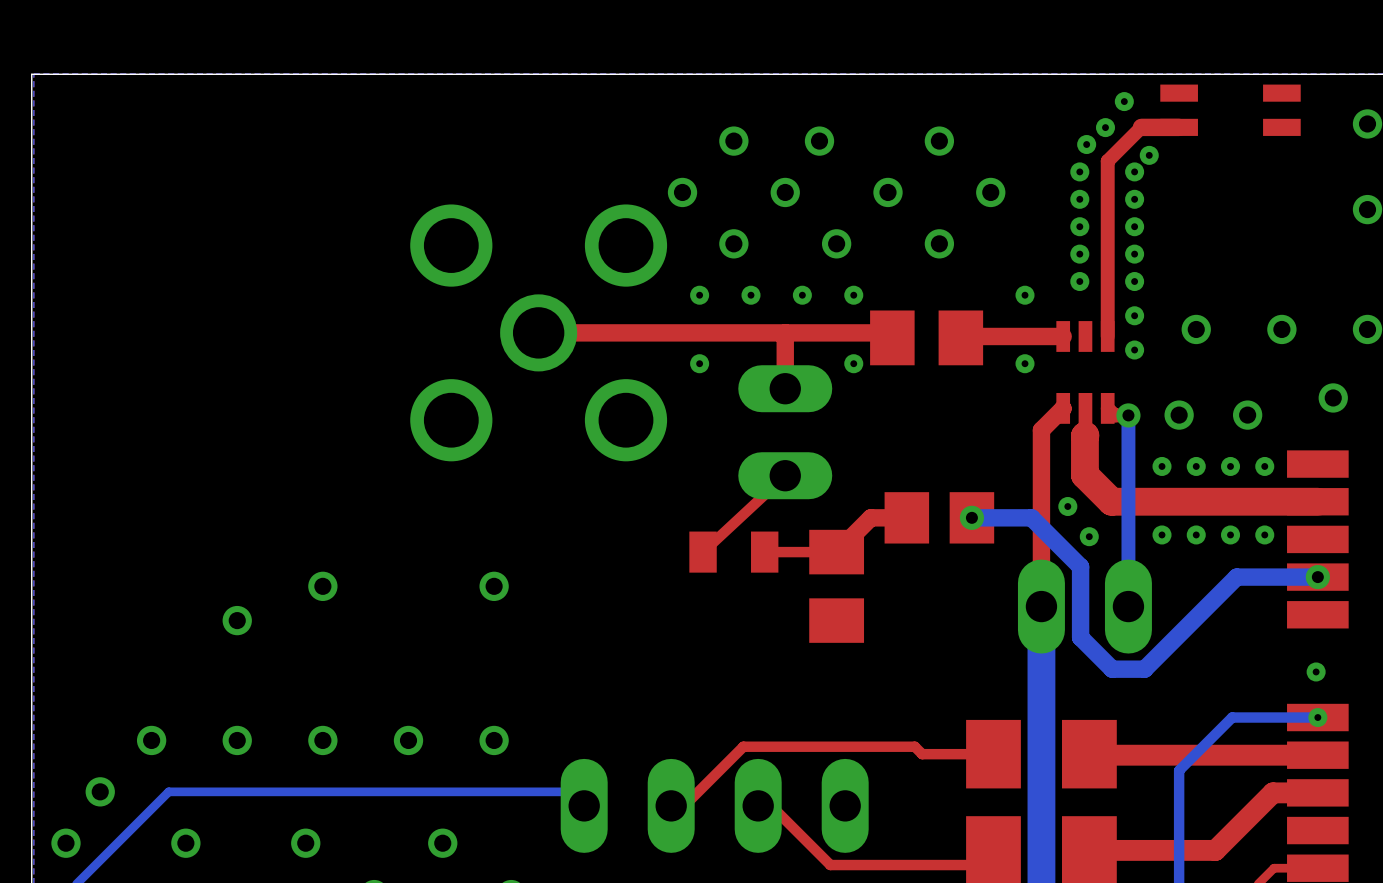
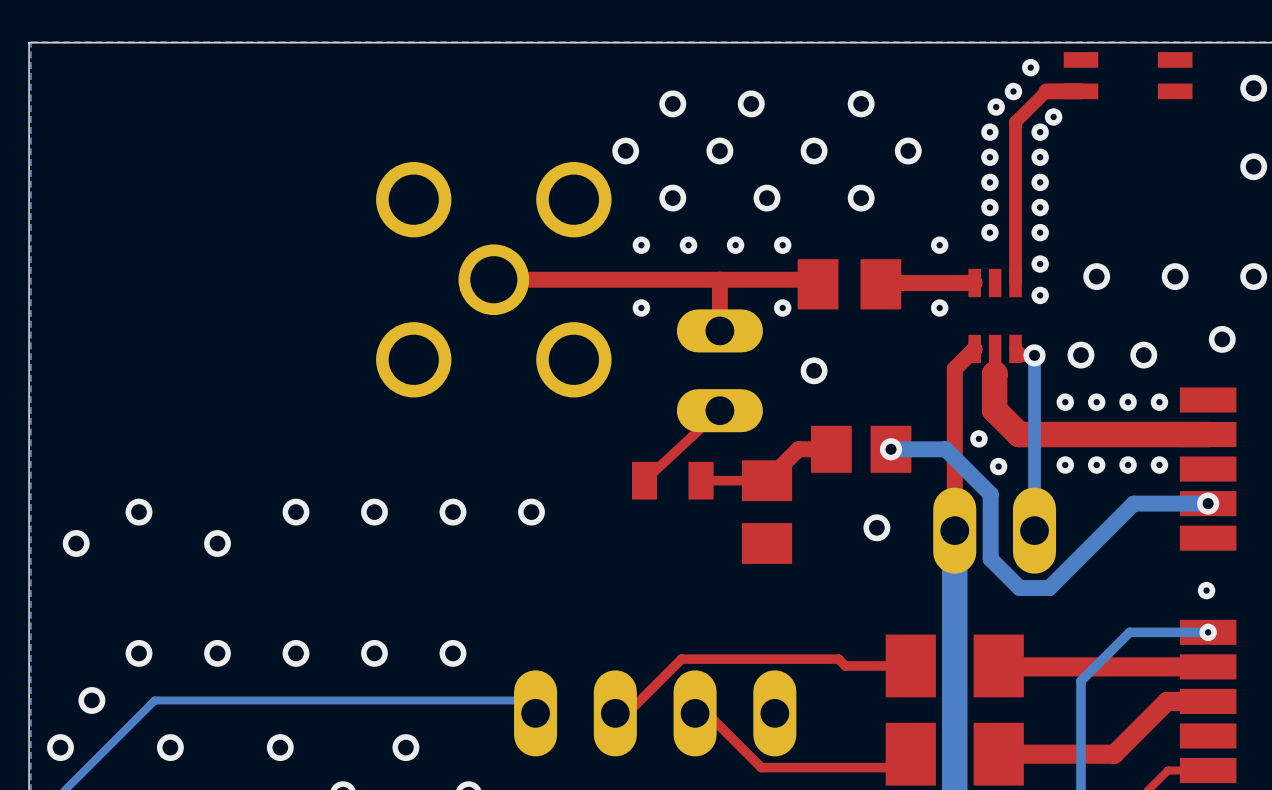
via: none -> (814, 370)
via: none -> (139, 512)
via: none -> (374, 512)
via: none -> (531, 512)
via: none -> (876, 527)
via: none -> (76, 543)

